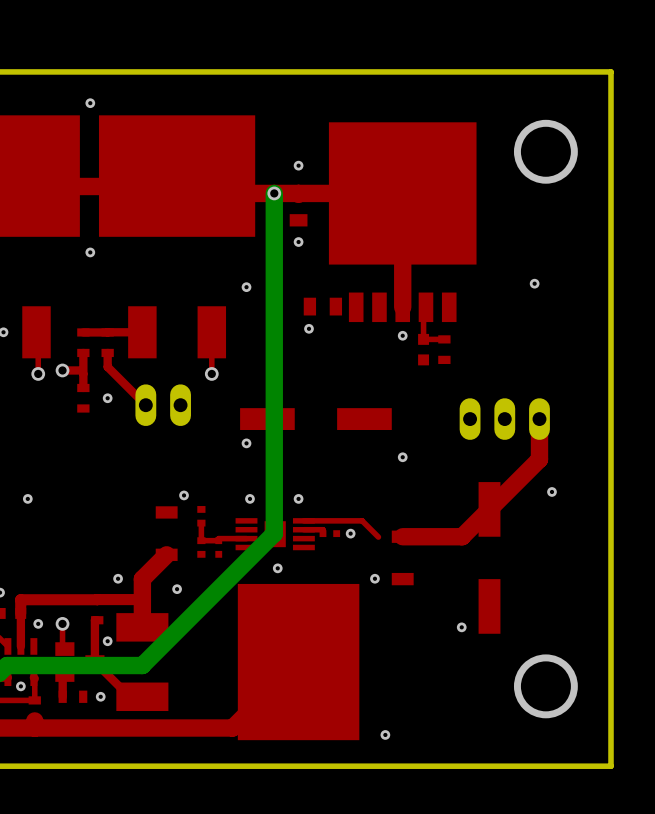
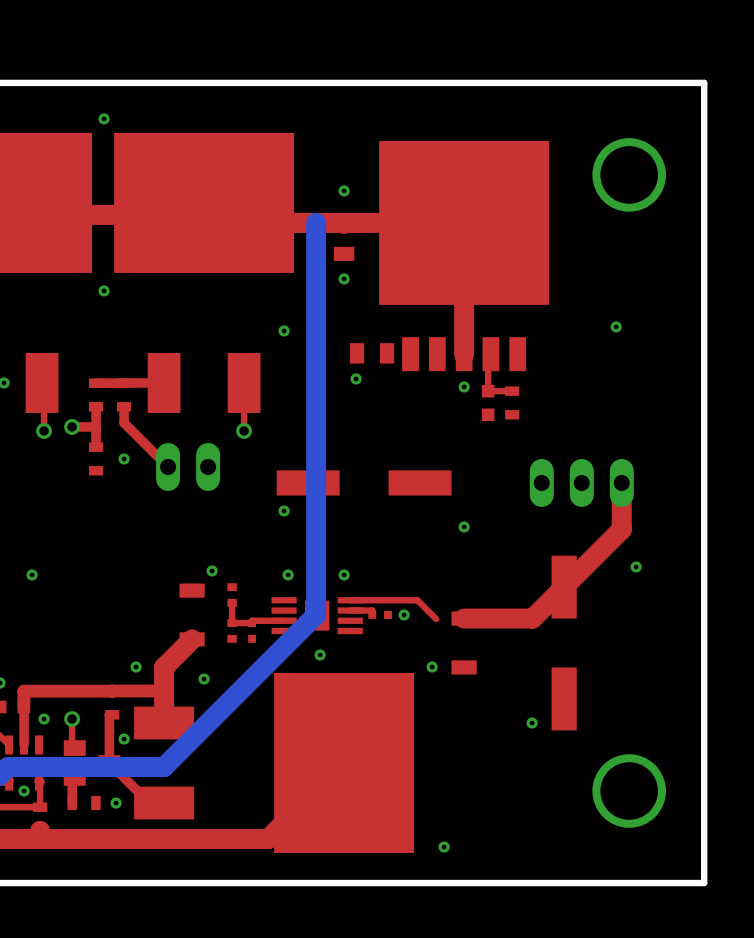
via: (274, 193) -> none

